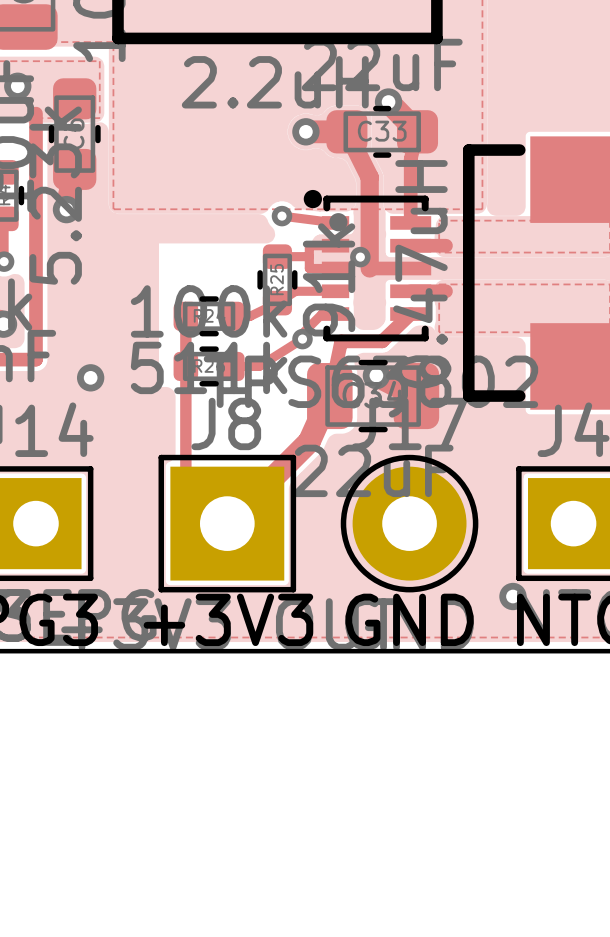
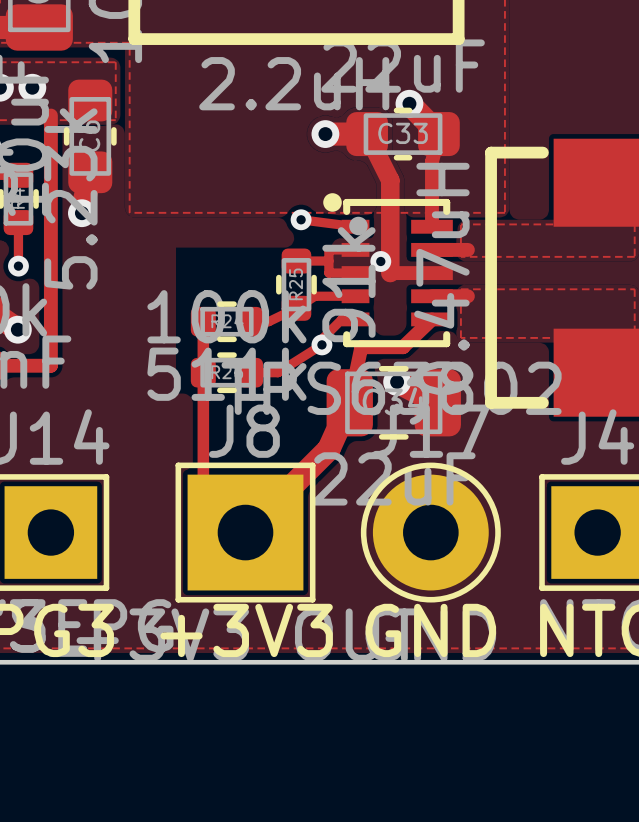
via: (90, 377) -> none
via: (512, 596) -> none

